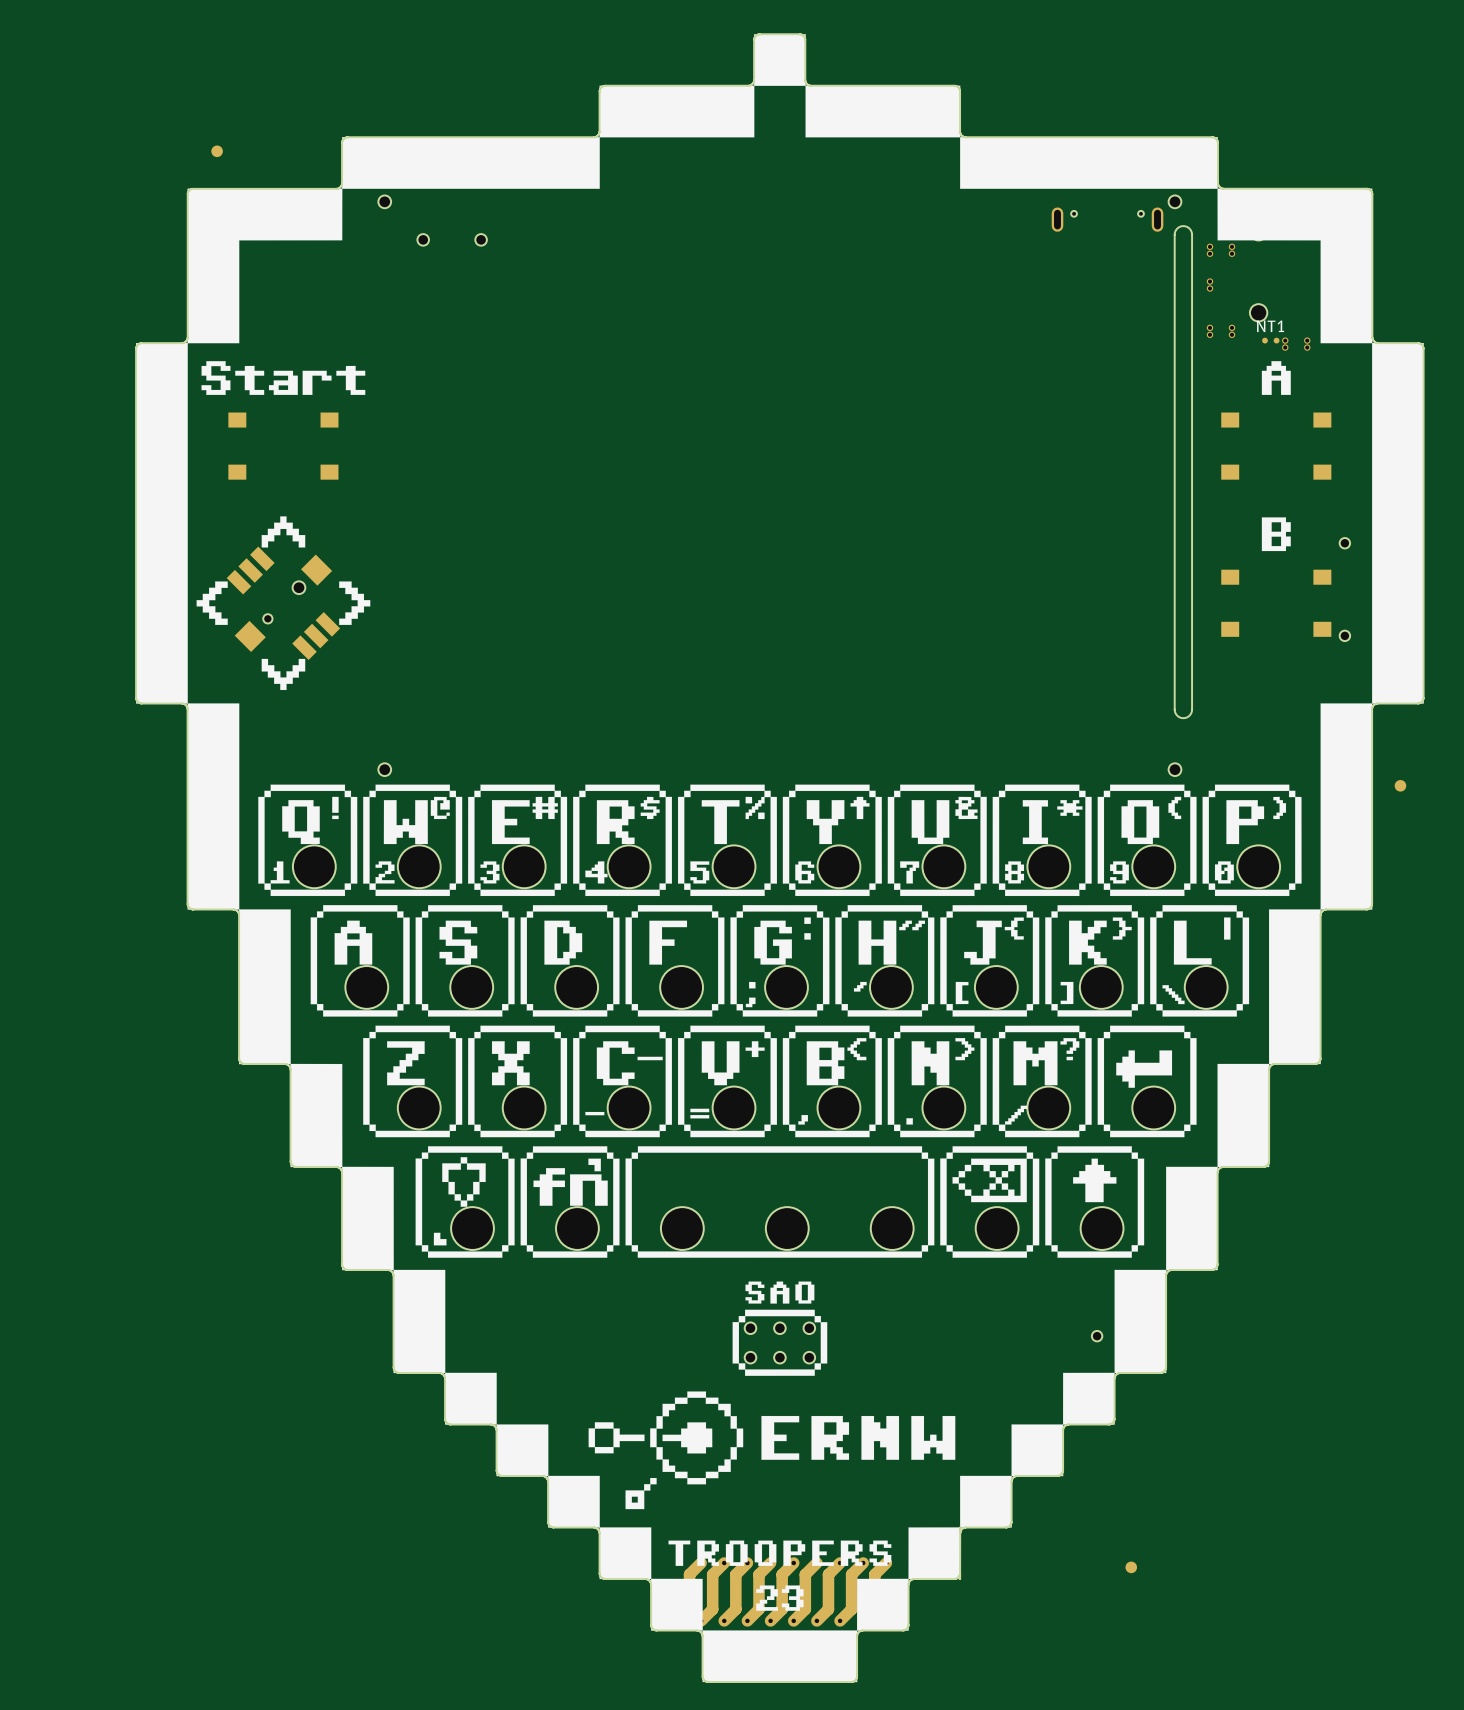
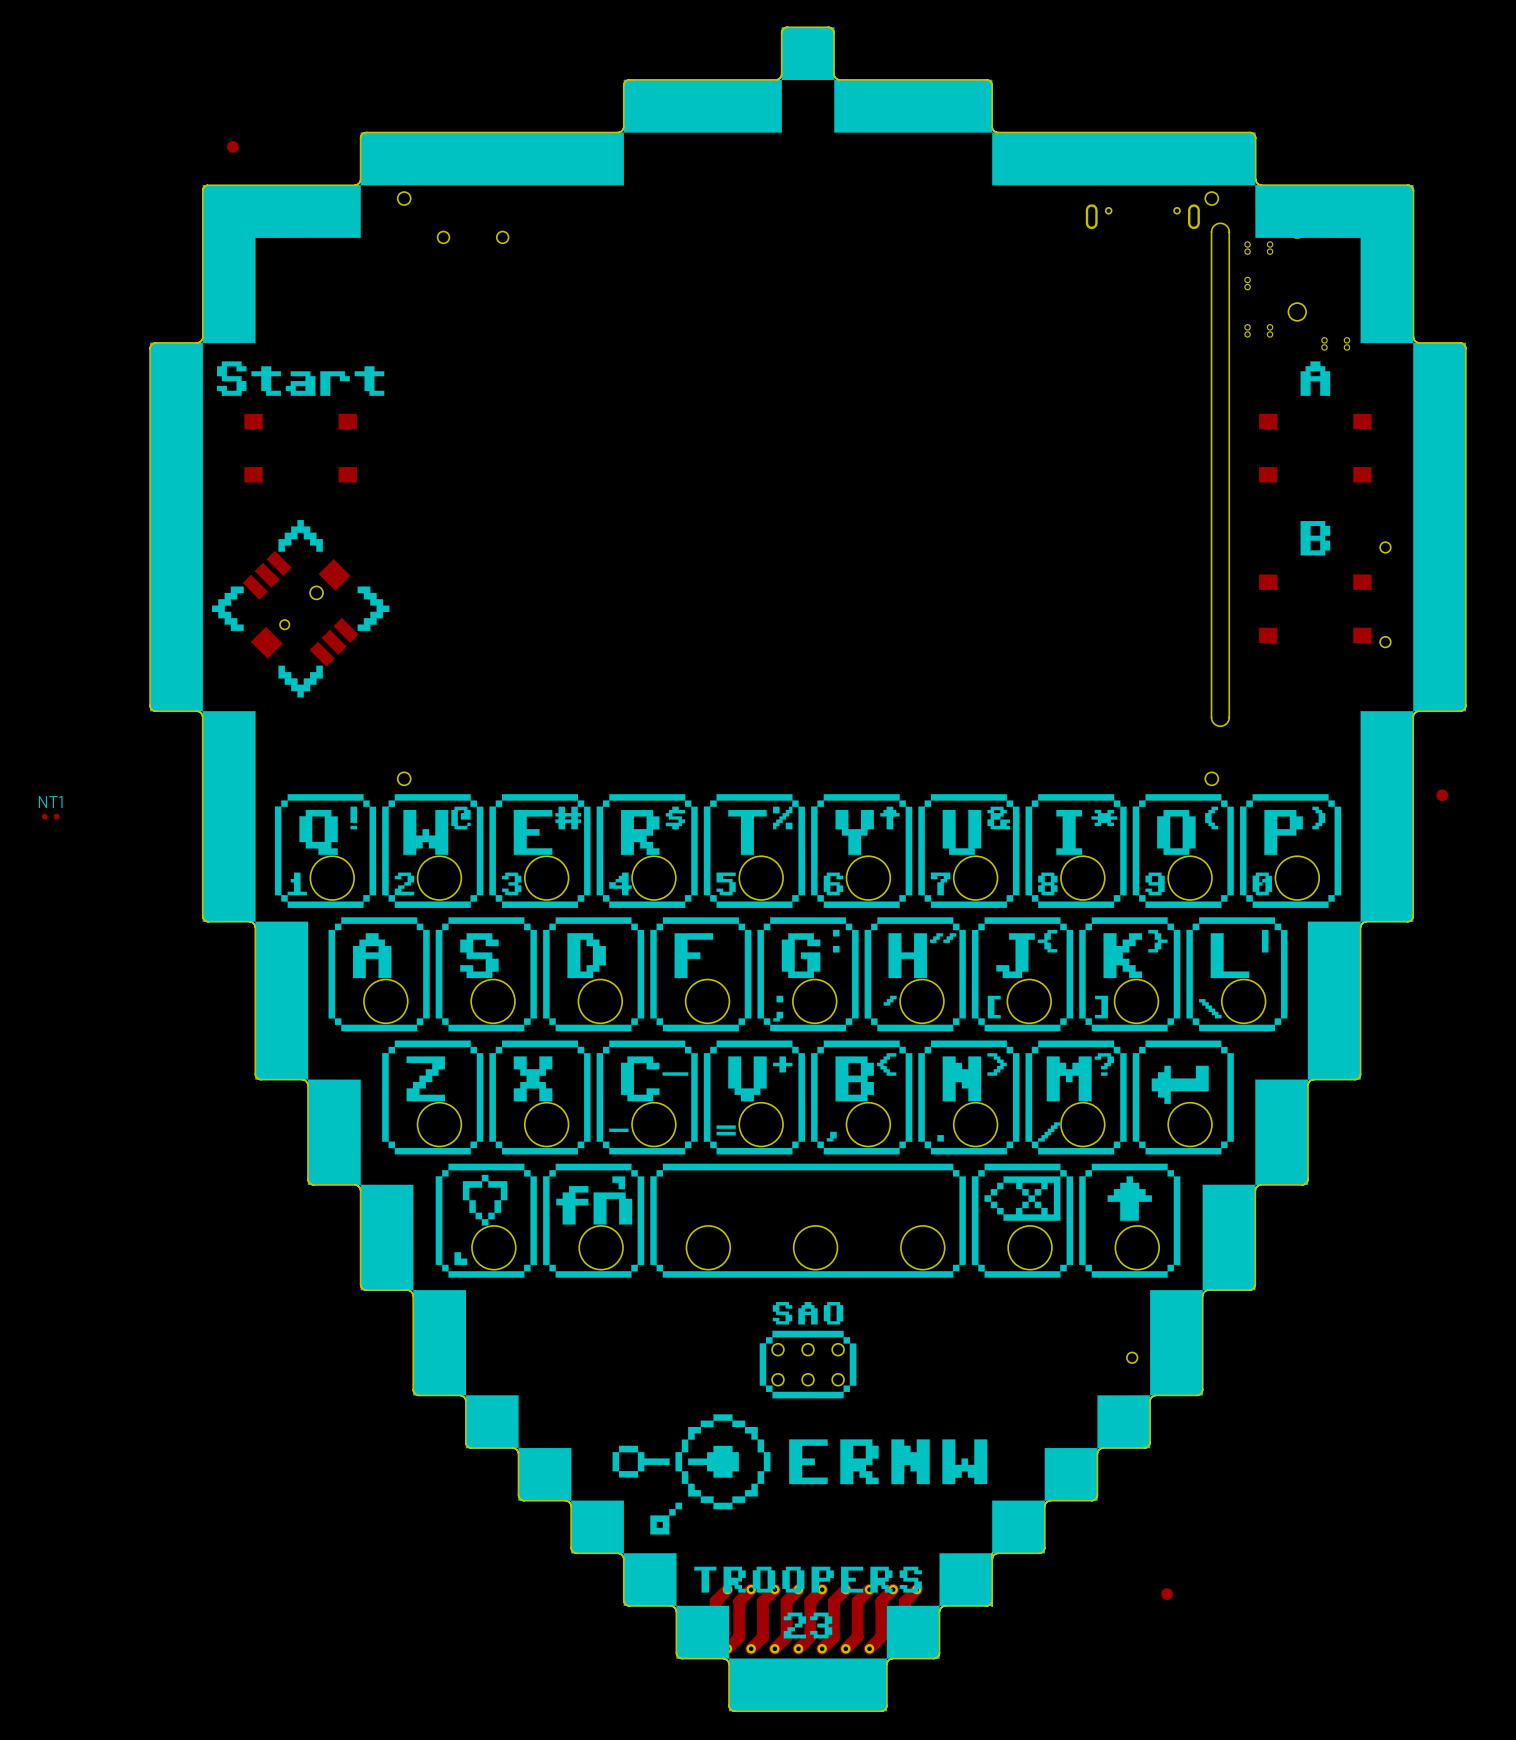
NT1 position: (1270, 340) -> (50, 816)

